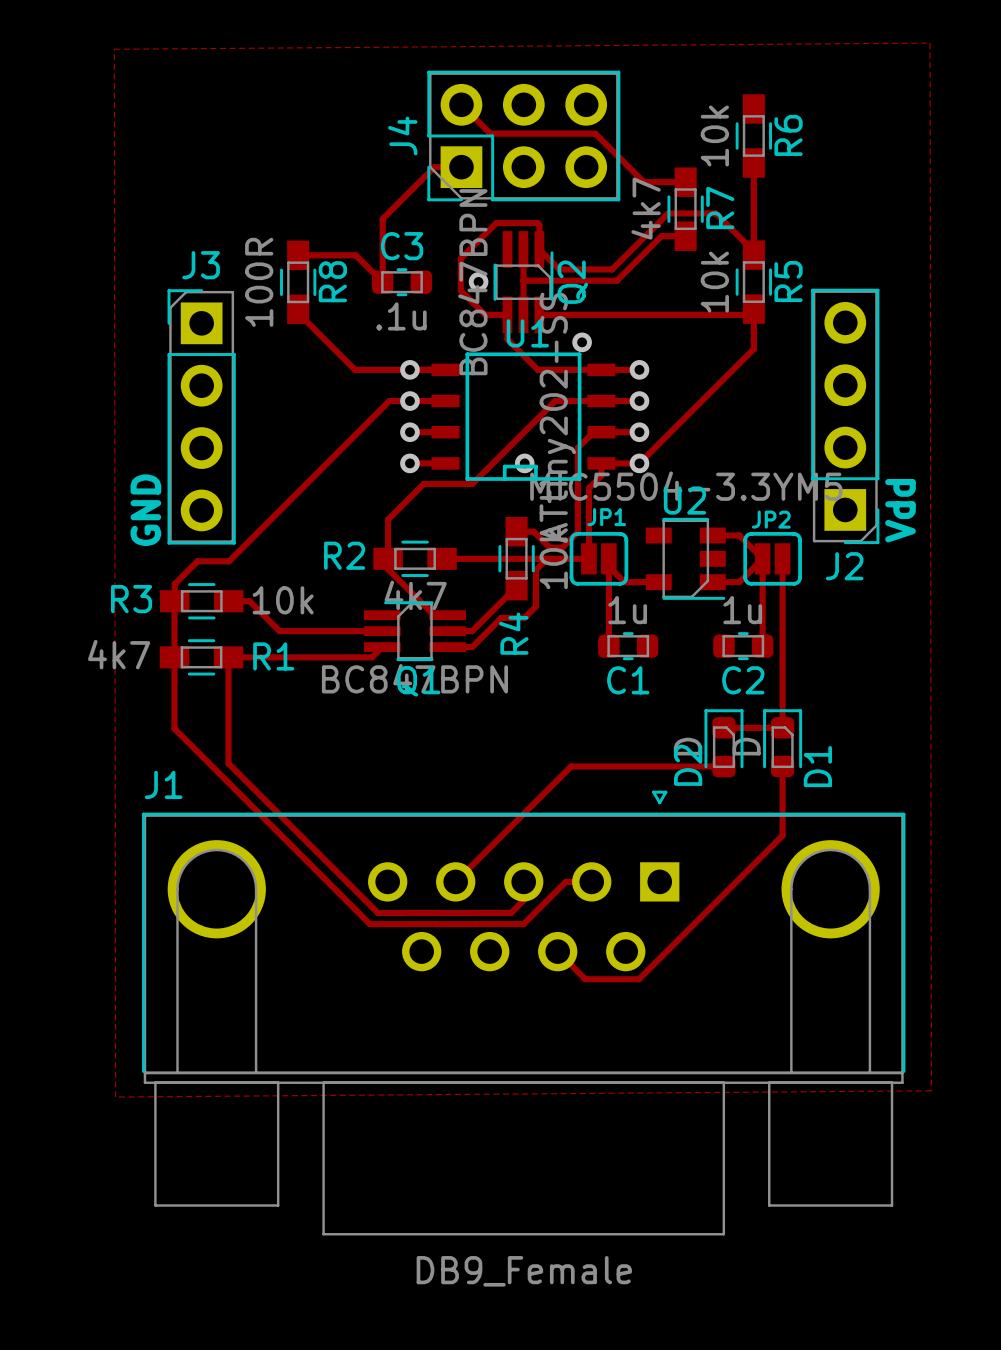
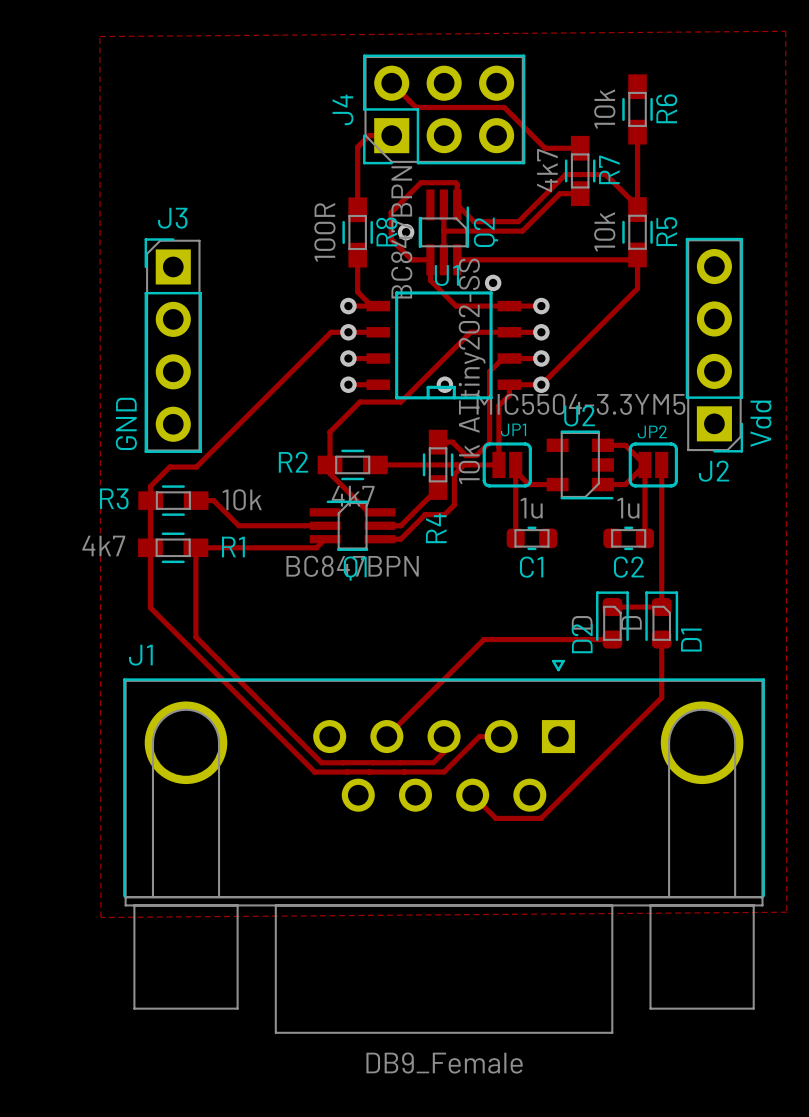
track: (420, 180) (382, 218) (382, 282) (355, 255) (298, 255) -> (357, 147) (357, 209)
R8 position: (298, 282) -> (357, 232)
C3: .1u (402, 282) -> none
track: (298, 309) (298, 313) (355, 369) (409, 369) -> none
track: none -> (357, 255) (357, 291) (371, 306)

